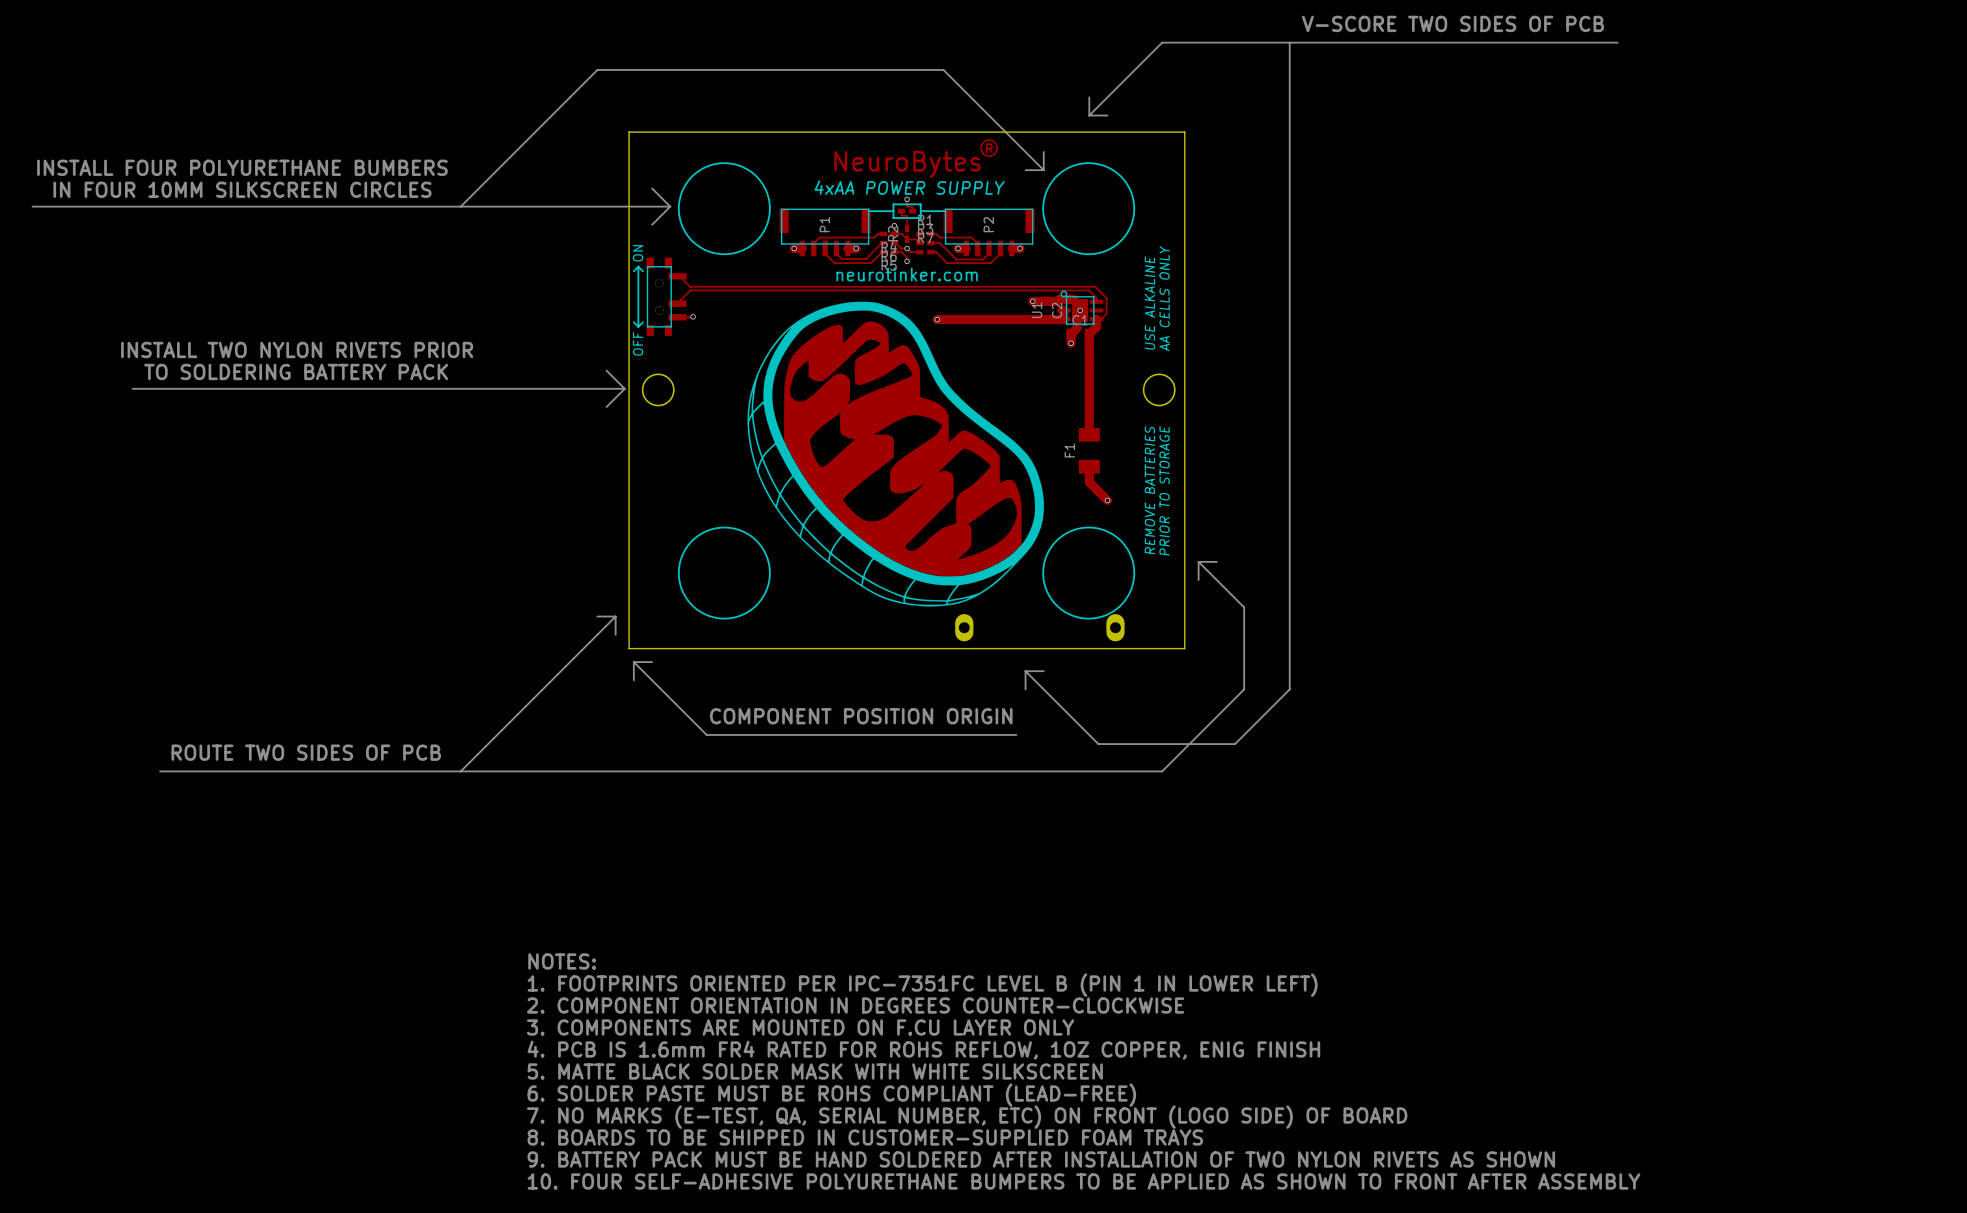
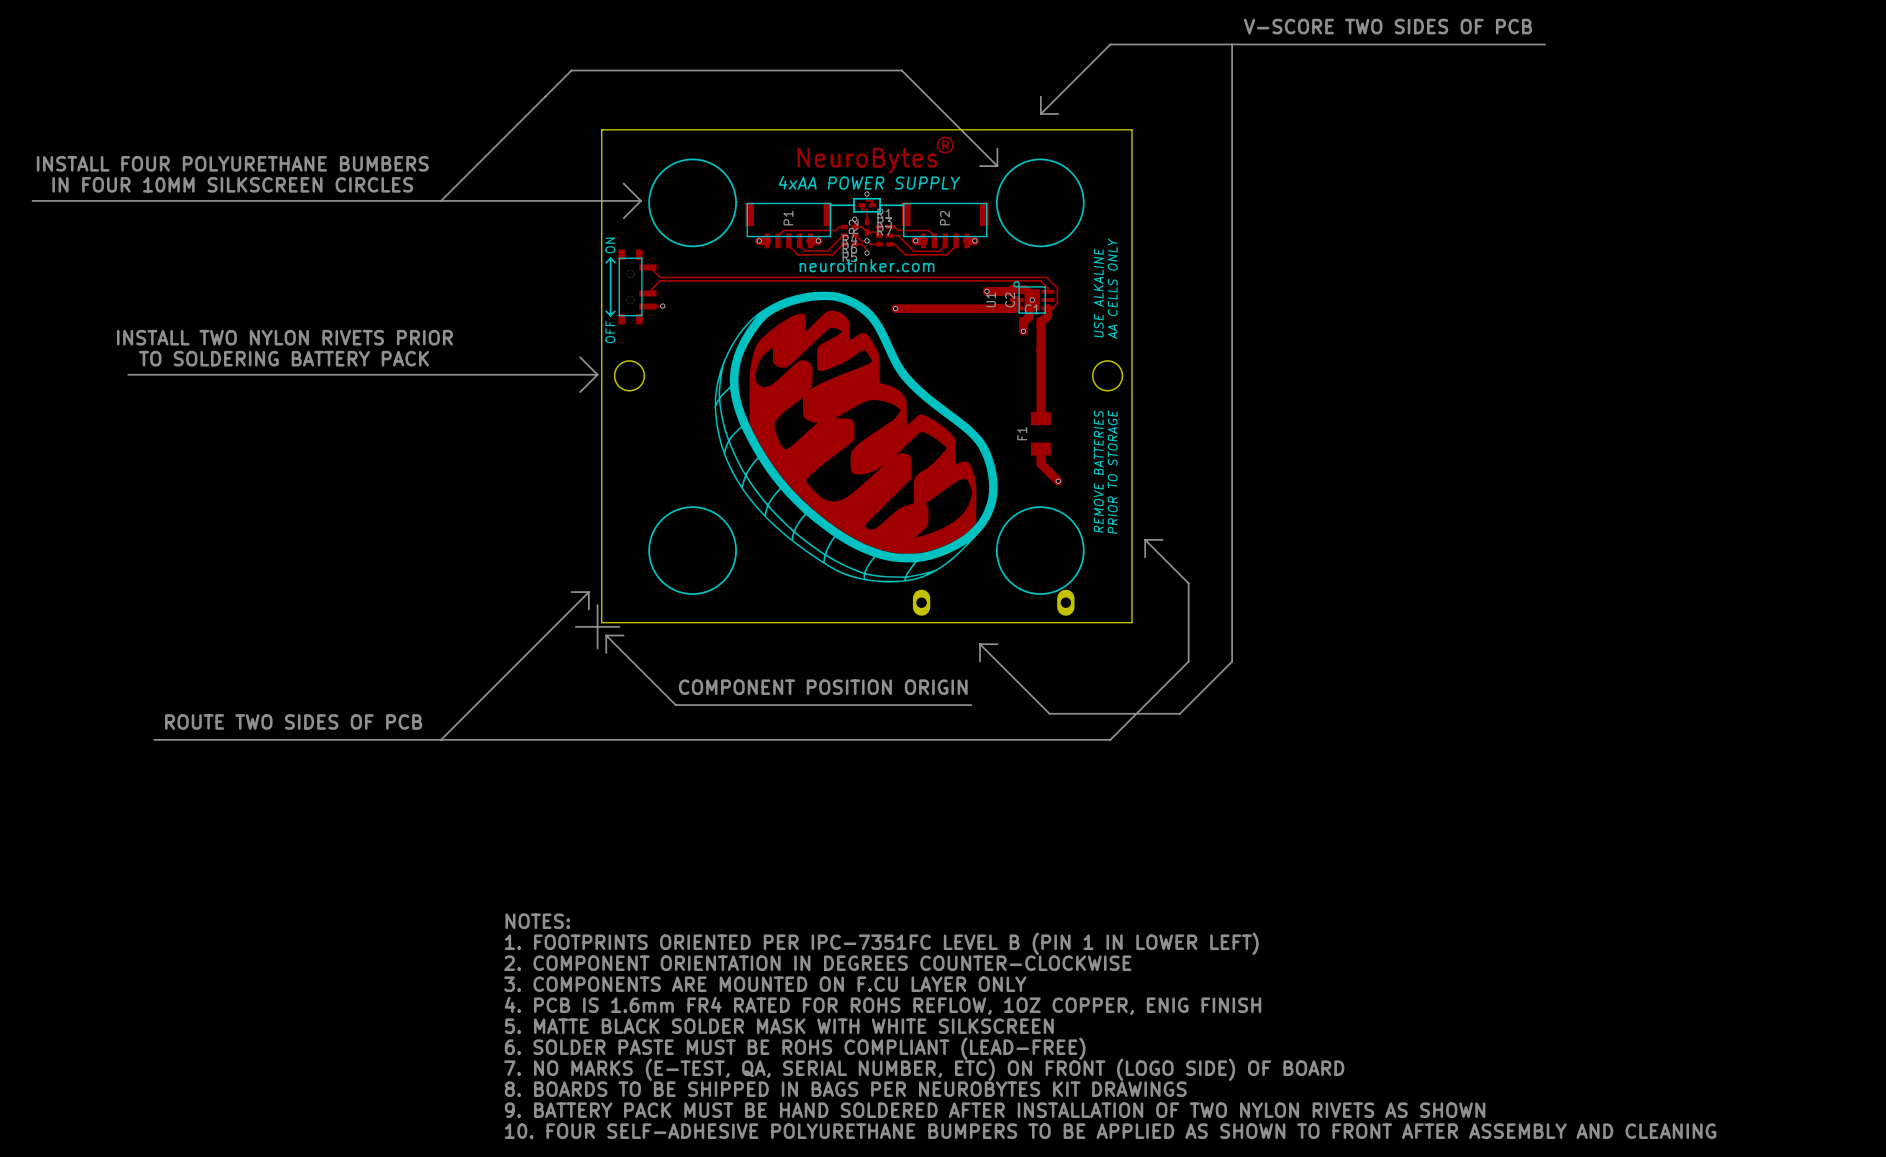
line: none -> (597, 605) (597, 648)
line: none -> (575, 626) (619, 626)
text: 8. BOARDS TO BE SHIPPED IN CUSTOMER-SUPPLIED FOAM TRAYS (865, 1137) -> 8. BOARDS TO BE SHIPPED IN BAGS PER NEUROBYTES KIT DRAWINGS (845, 1089)
text: 10. FOUR SELF-ADHESIVE POLYURETHANE BUMPERS TO BE APPLIED AS SHOWN TO FRONT AFTER ASSEMBLY (1083, 1181) -> 10. FOUR SELF-ADHESIVE POLYURETHANE BUMPERS TO BE APPLIED AS SHOWN TO FRONT AFTER ASSEMBLY AND CLEANING (1110, 1131)

